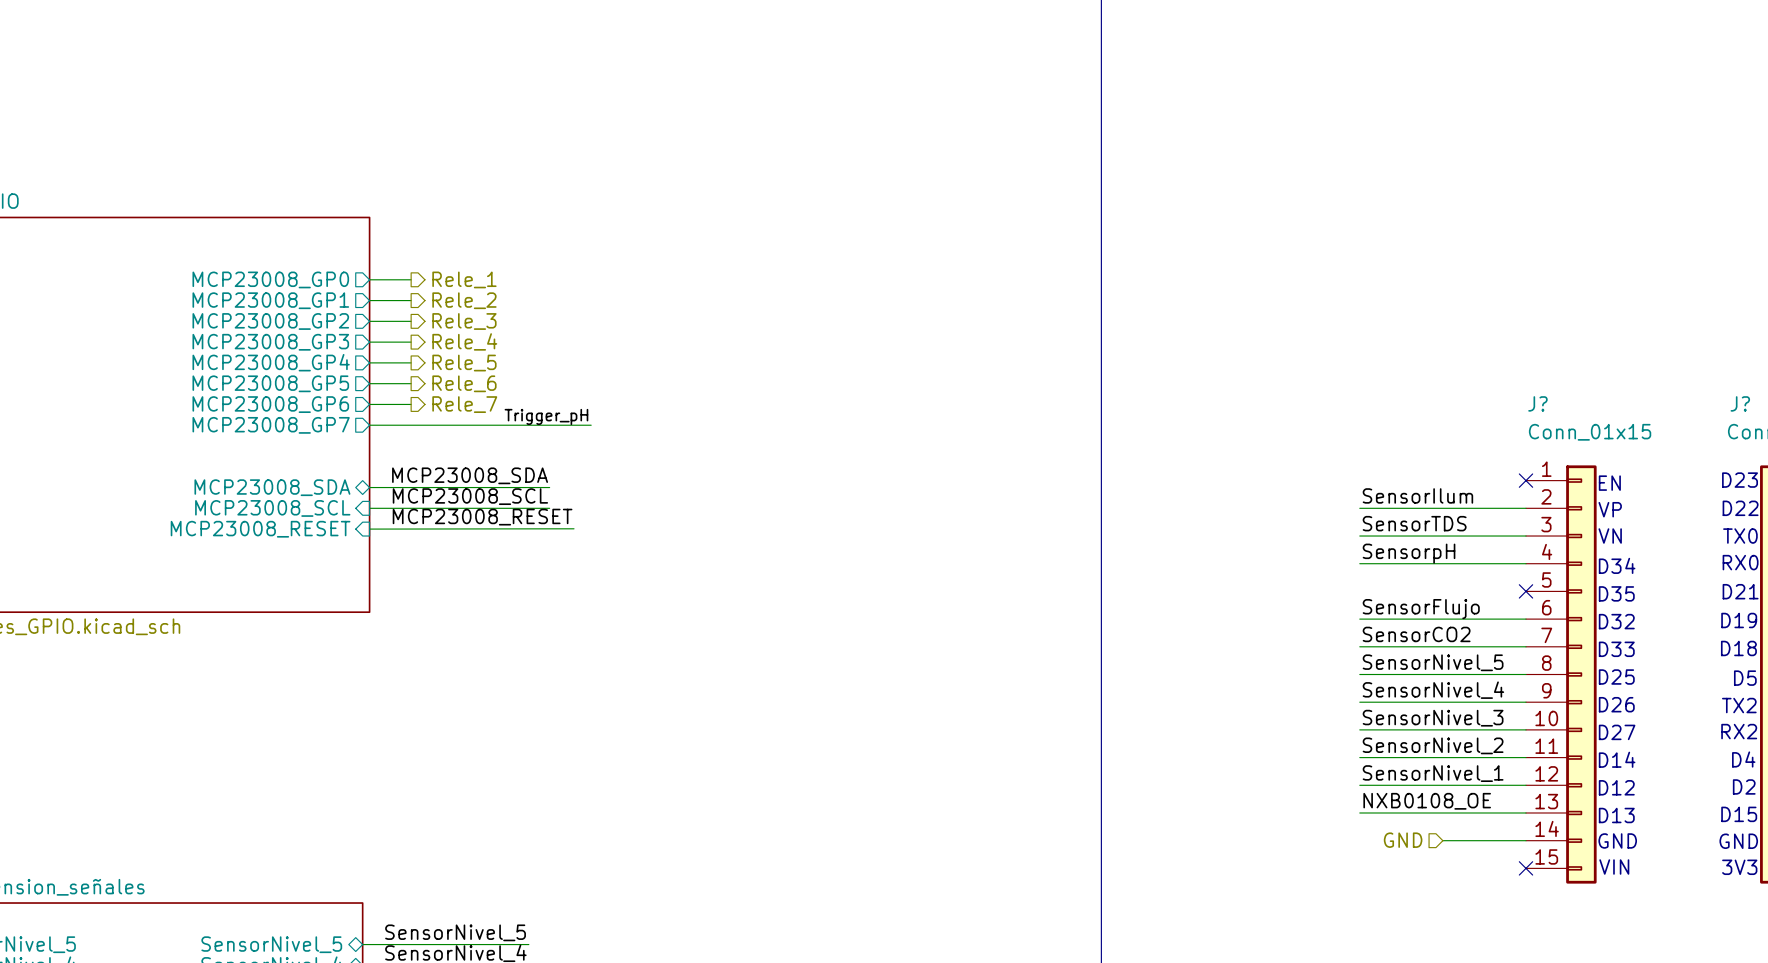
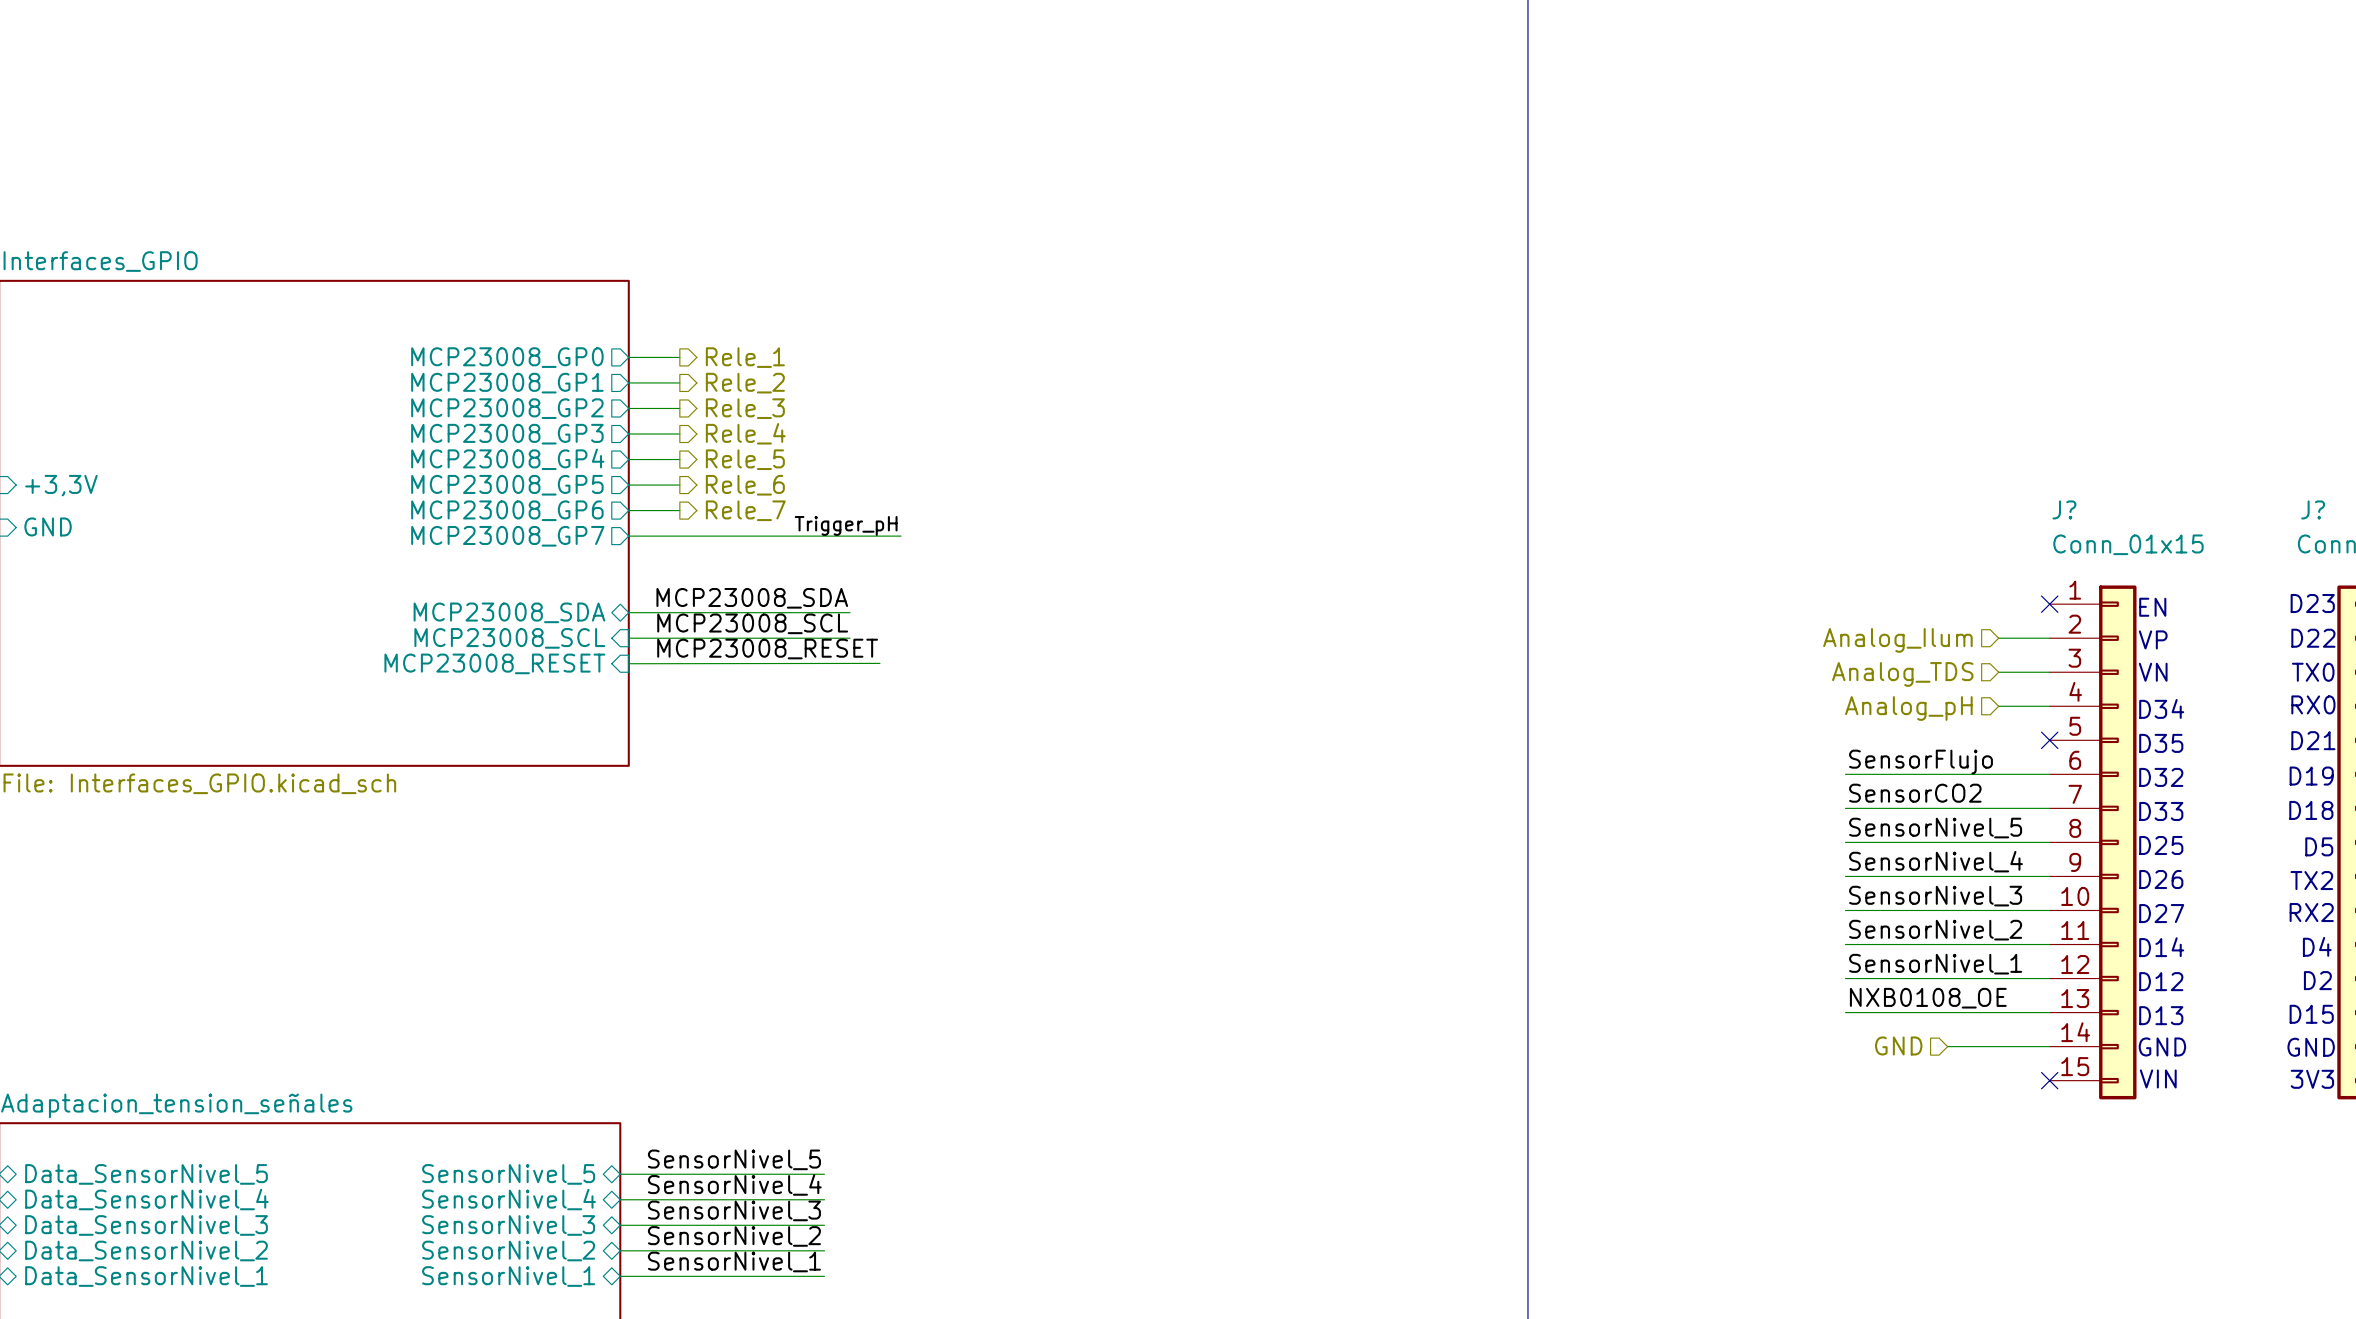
label: SensorIlum (1417, 495) -> none
wire: (1359, 508) (1484, 508) -> none
hierarchical label: none -> Analog_Ilum (1897, 640)
label: SensorTDS (1414, 523) -> none
wire: (1359, 536) (1484, 536) -> none
hierarchical label: none -> Analog_TDS (1902, 674)
label: SensorpH (1409, 553) -> none
wire: (1359, 563) (1484, 563) -> none
hierarchical label: none -> Analog_pH (1908, 708)

